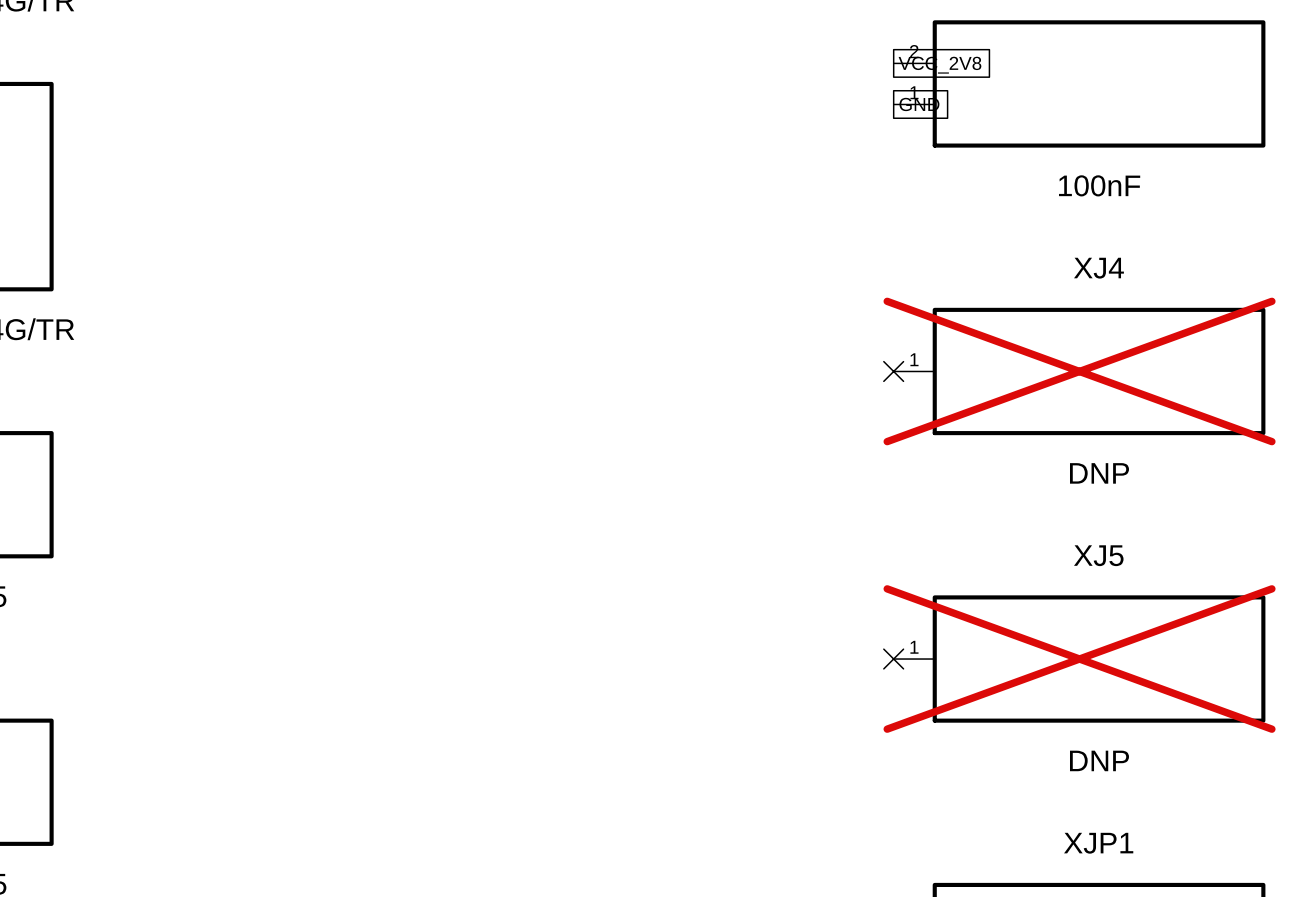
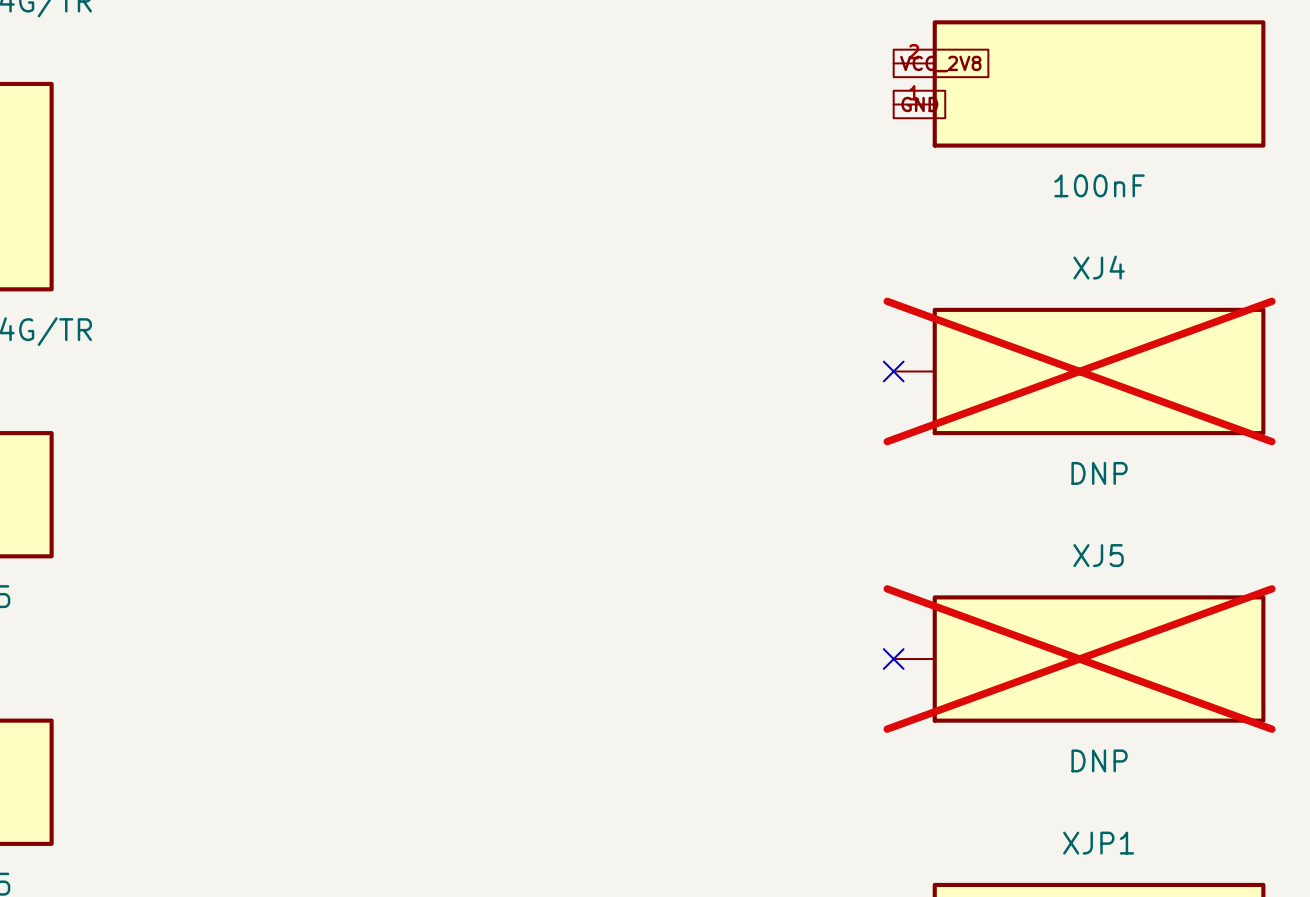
XJ4 pin number: 1 (914, 359) -> none
XJ5 pin number: 1 (914, 647) -> none

